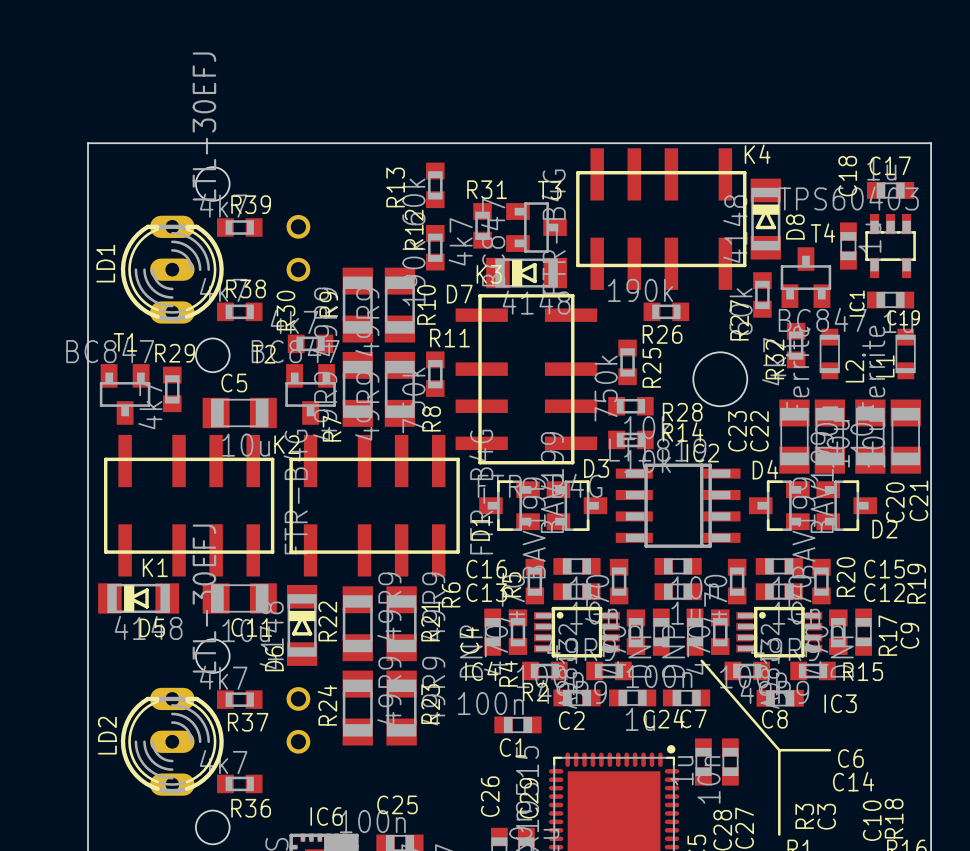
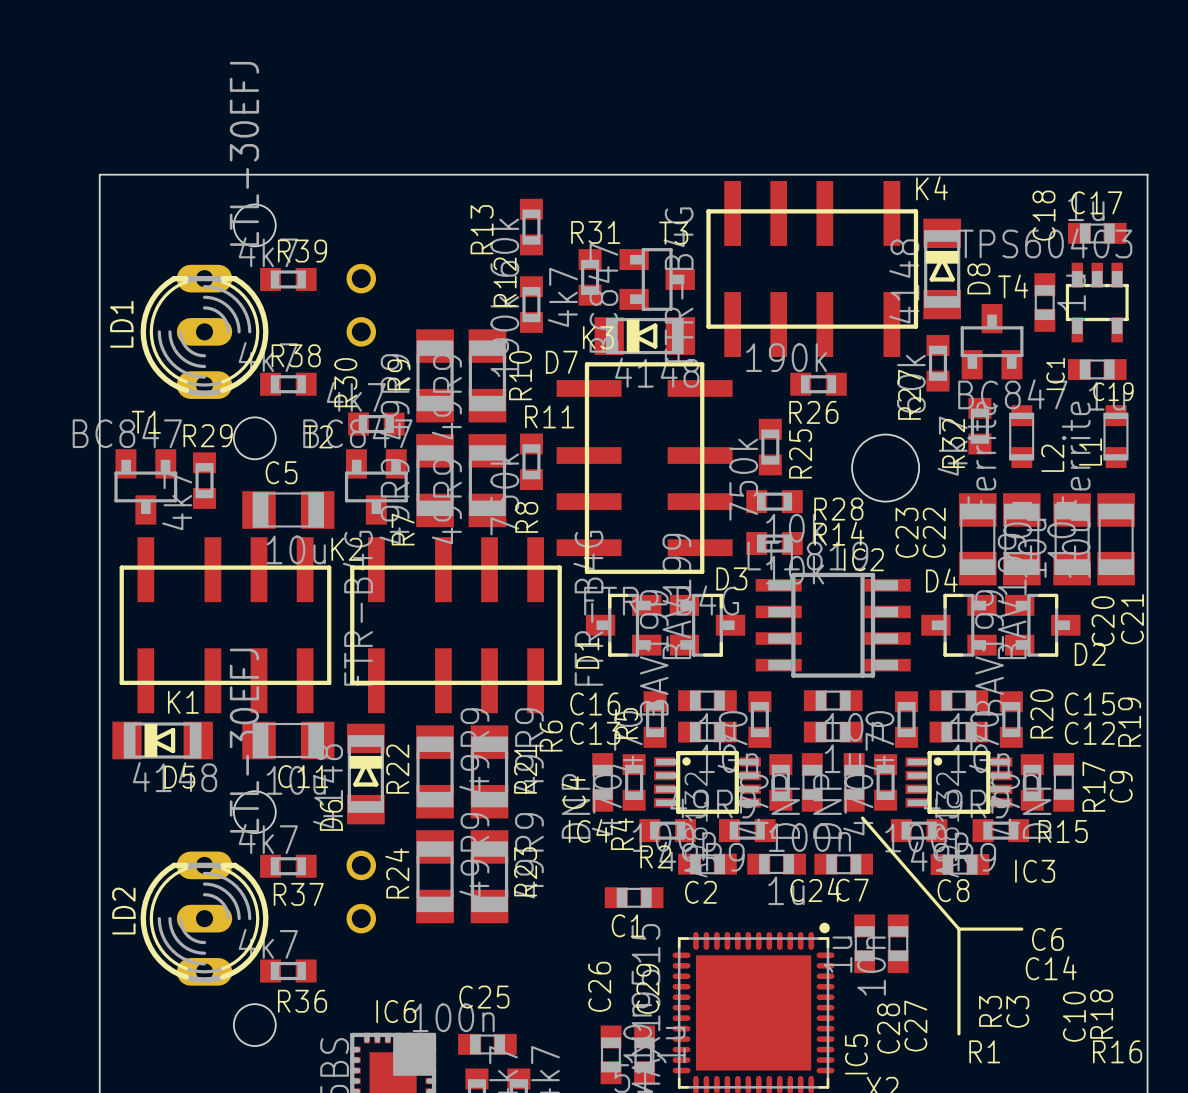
C1 value: 100n (490, 703) -> none

